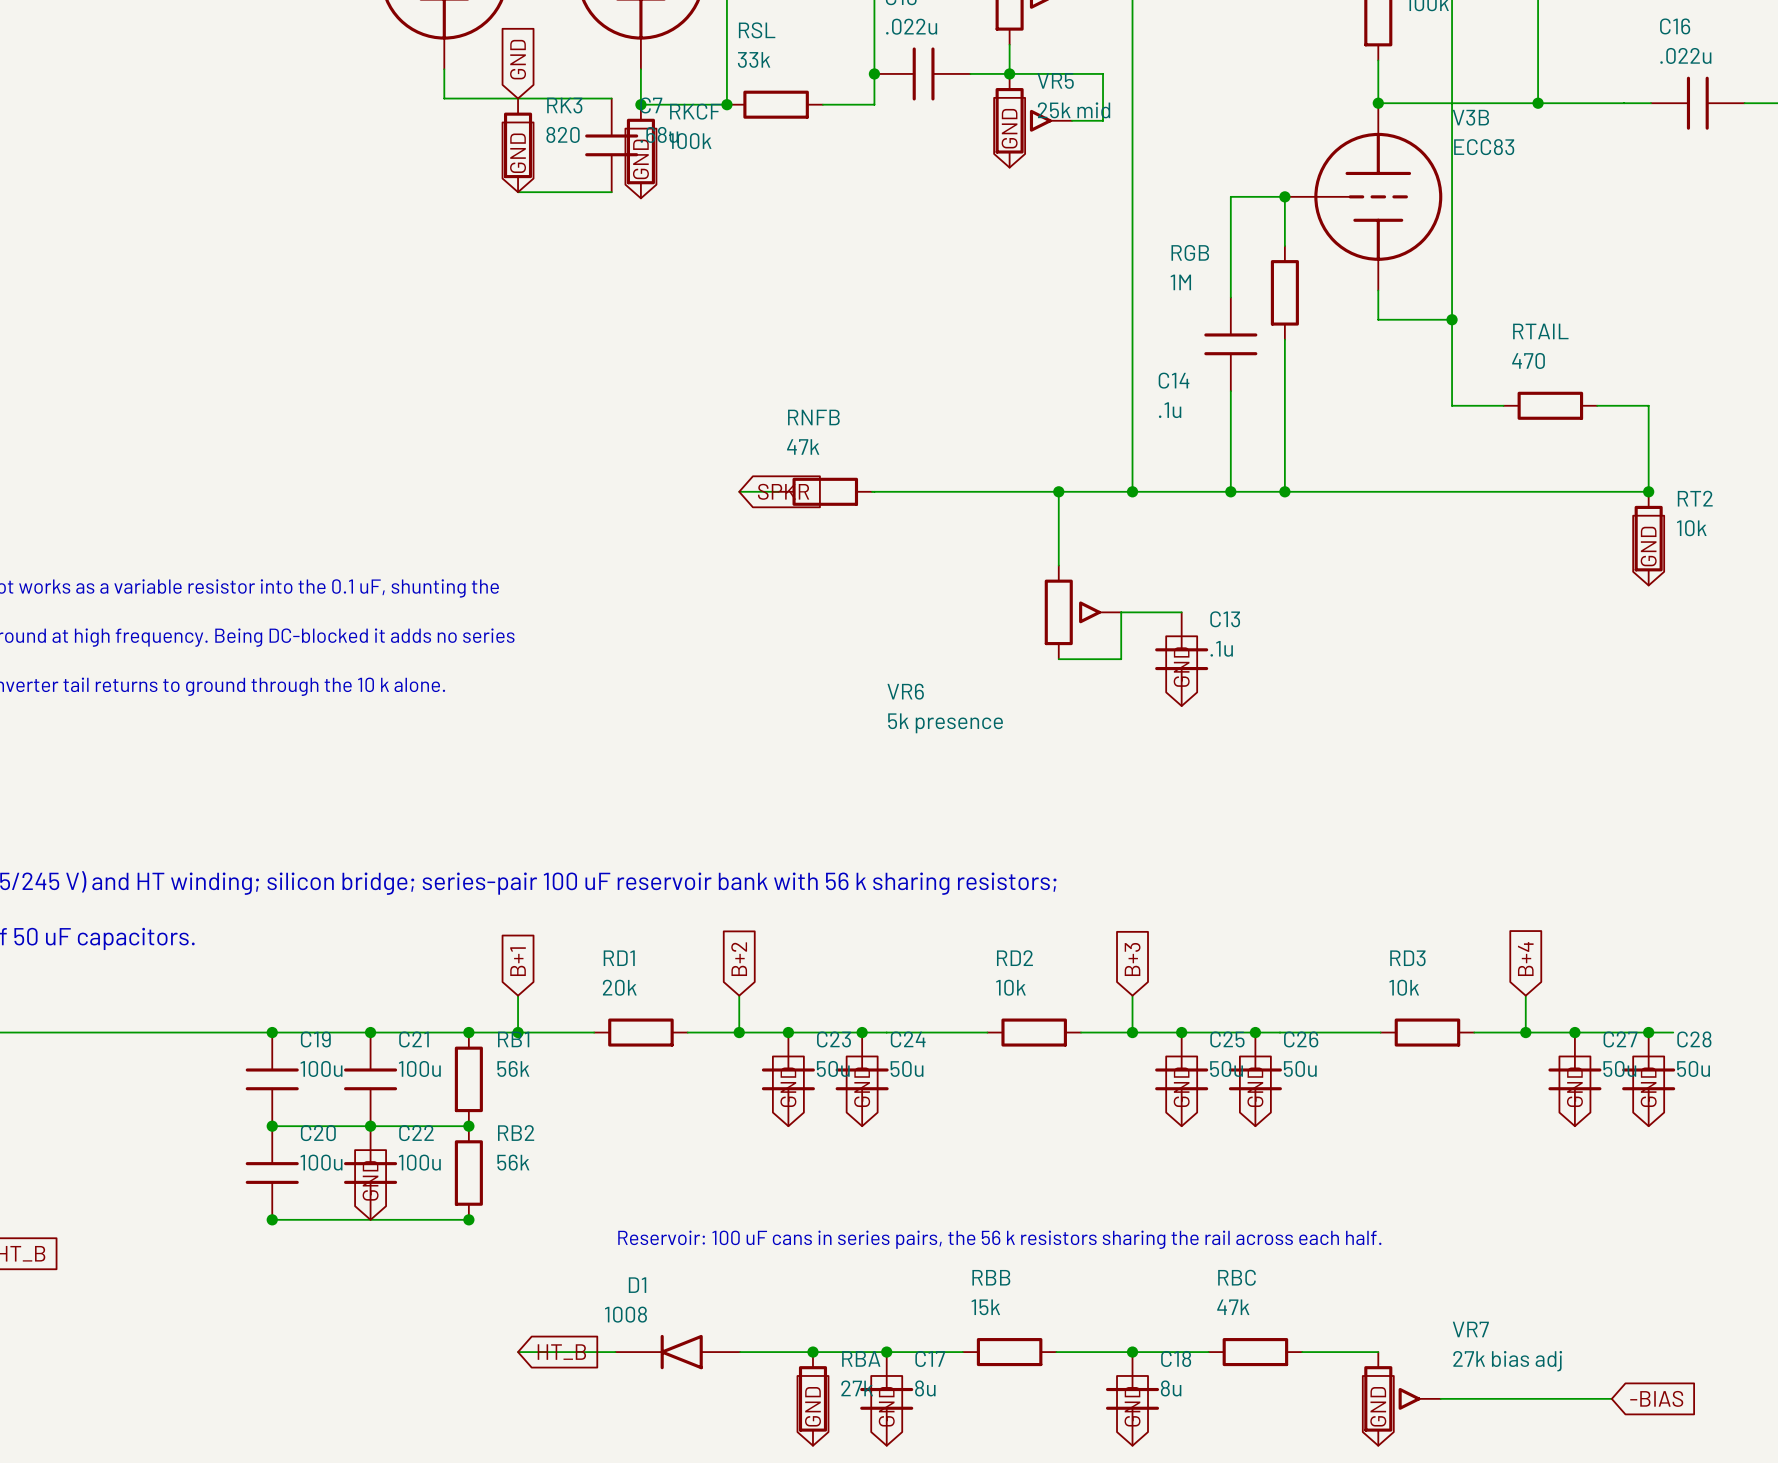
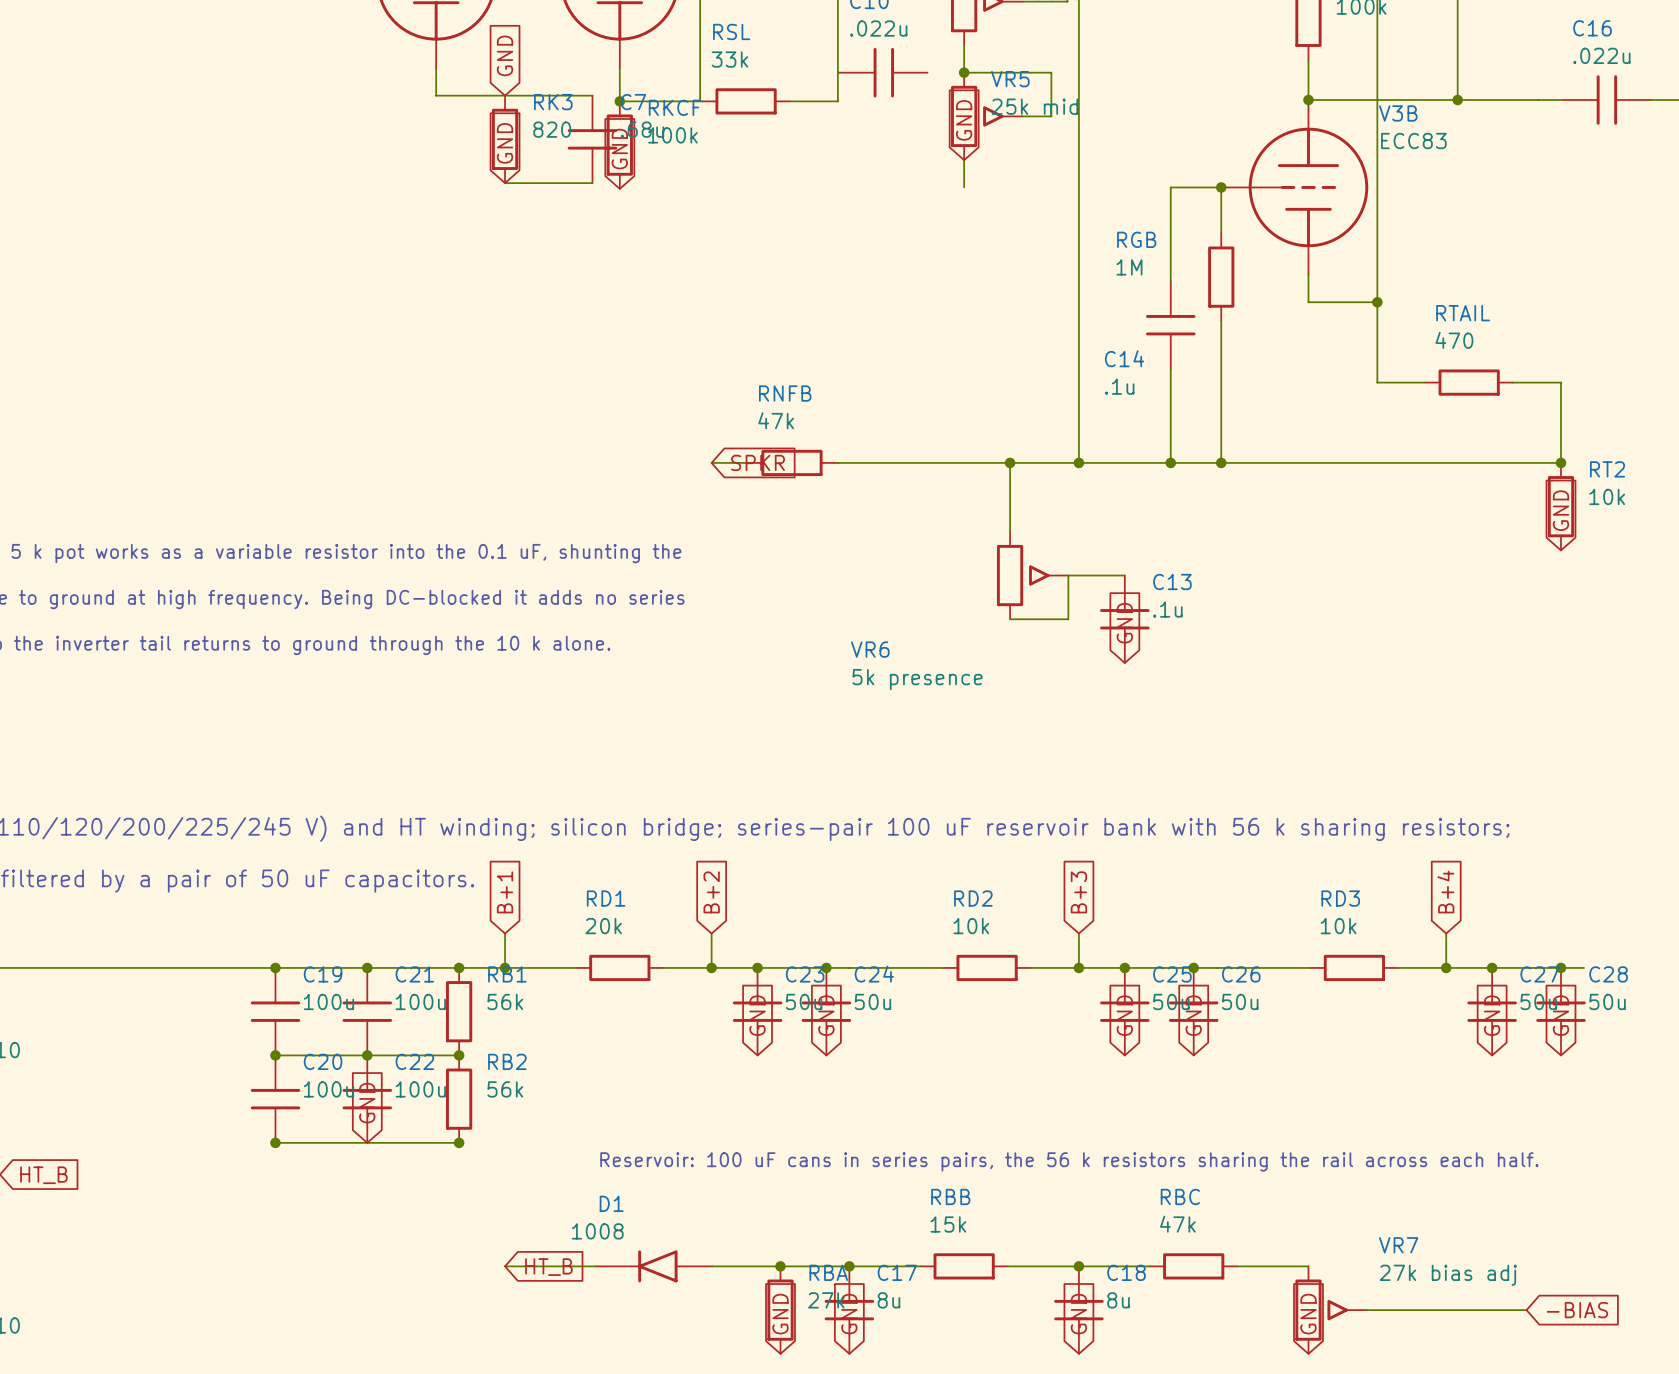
junction: (874, 73) -> none
wire: (970, 73) (1009, 73) -> none
junction: (726, 104) -> none
wire: none -> (964, 160) (964, 187)

